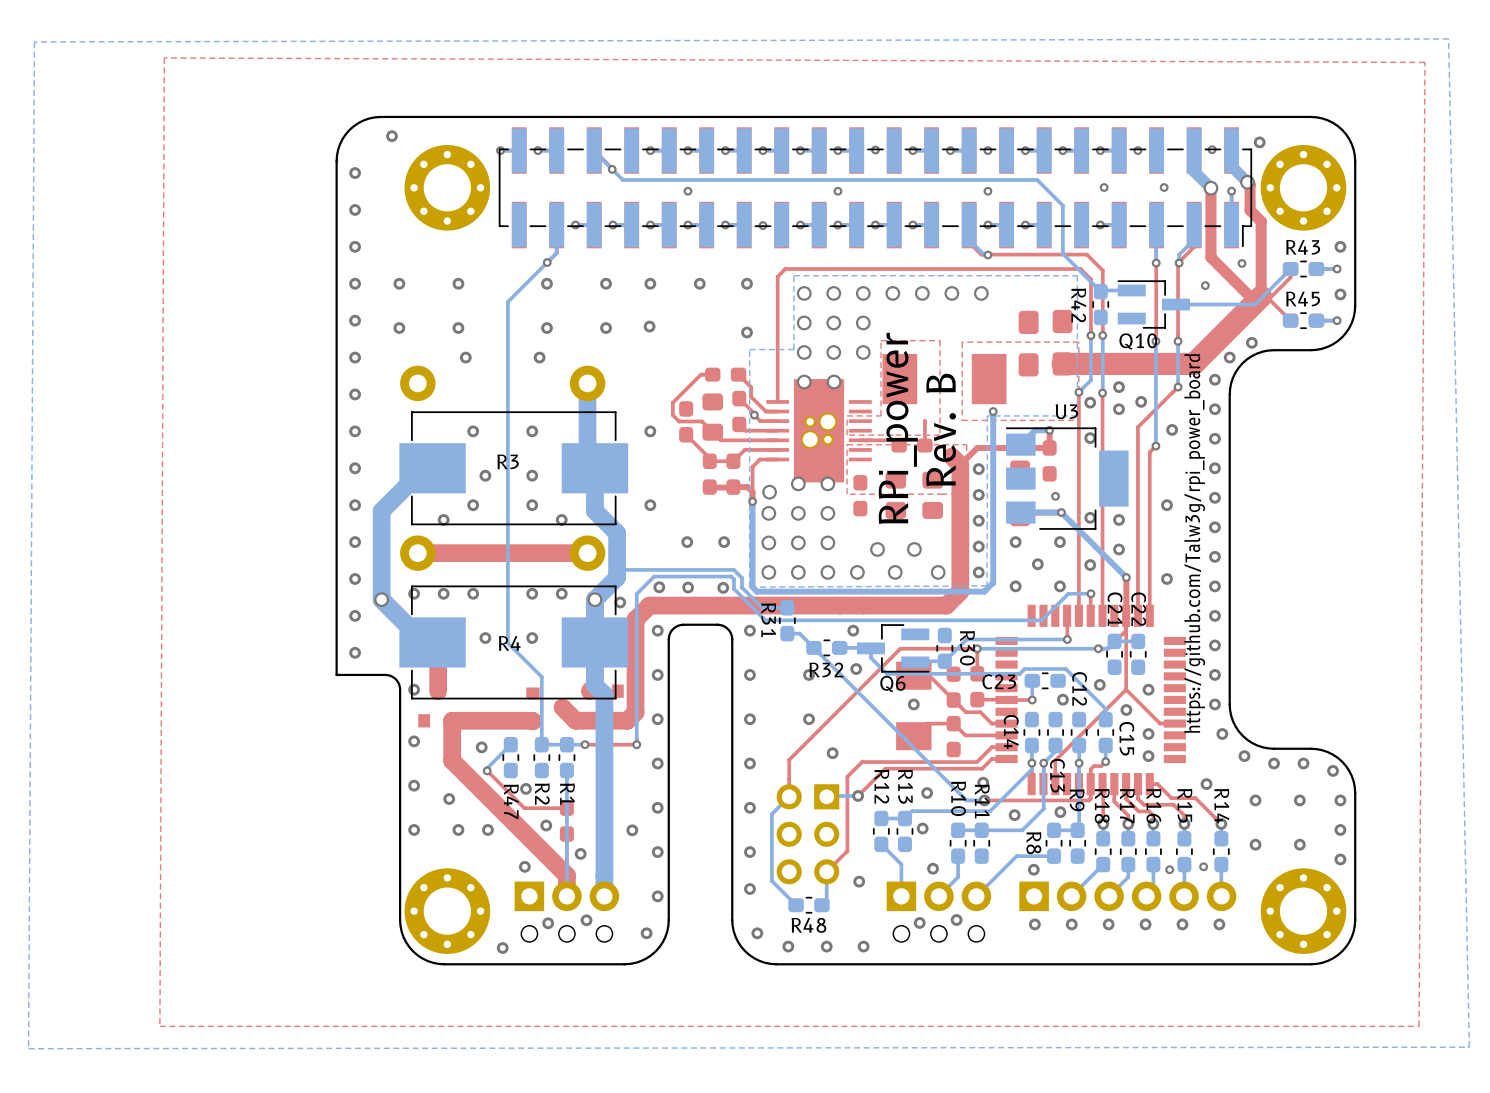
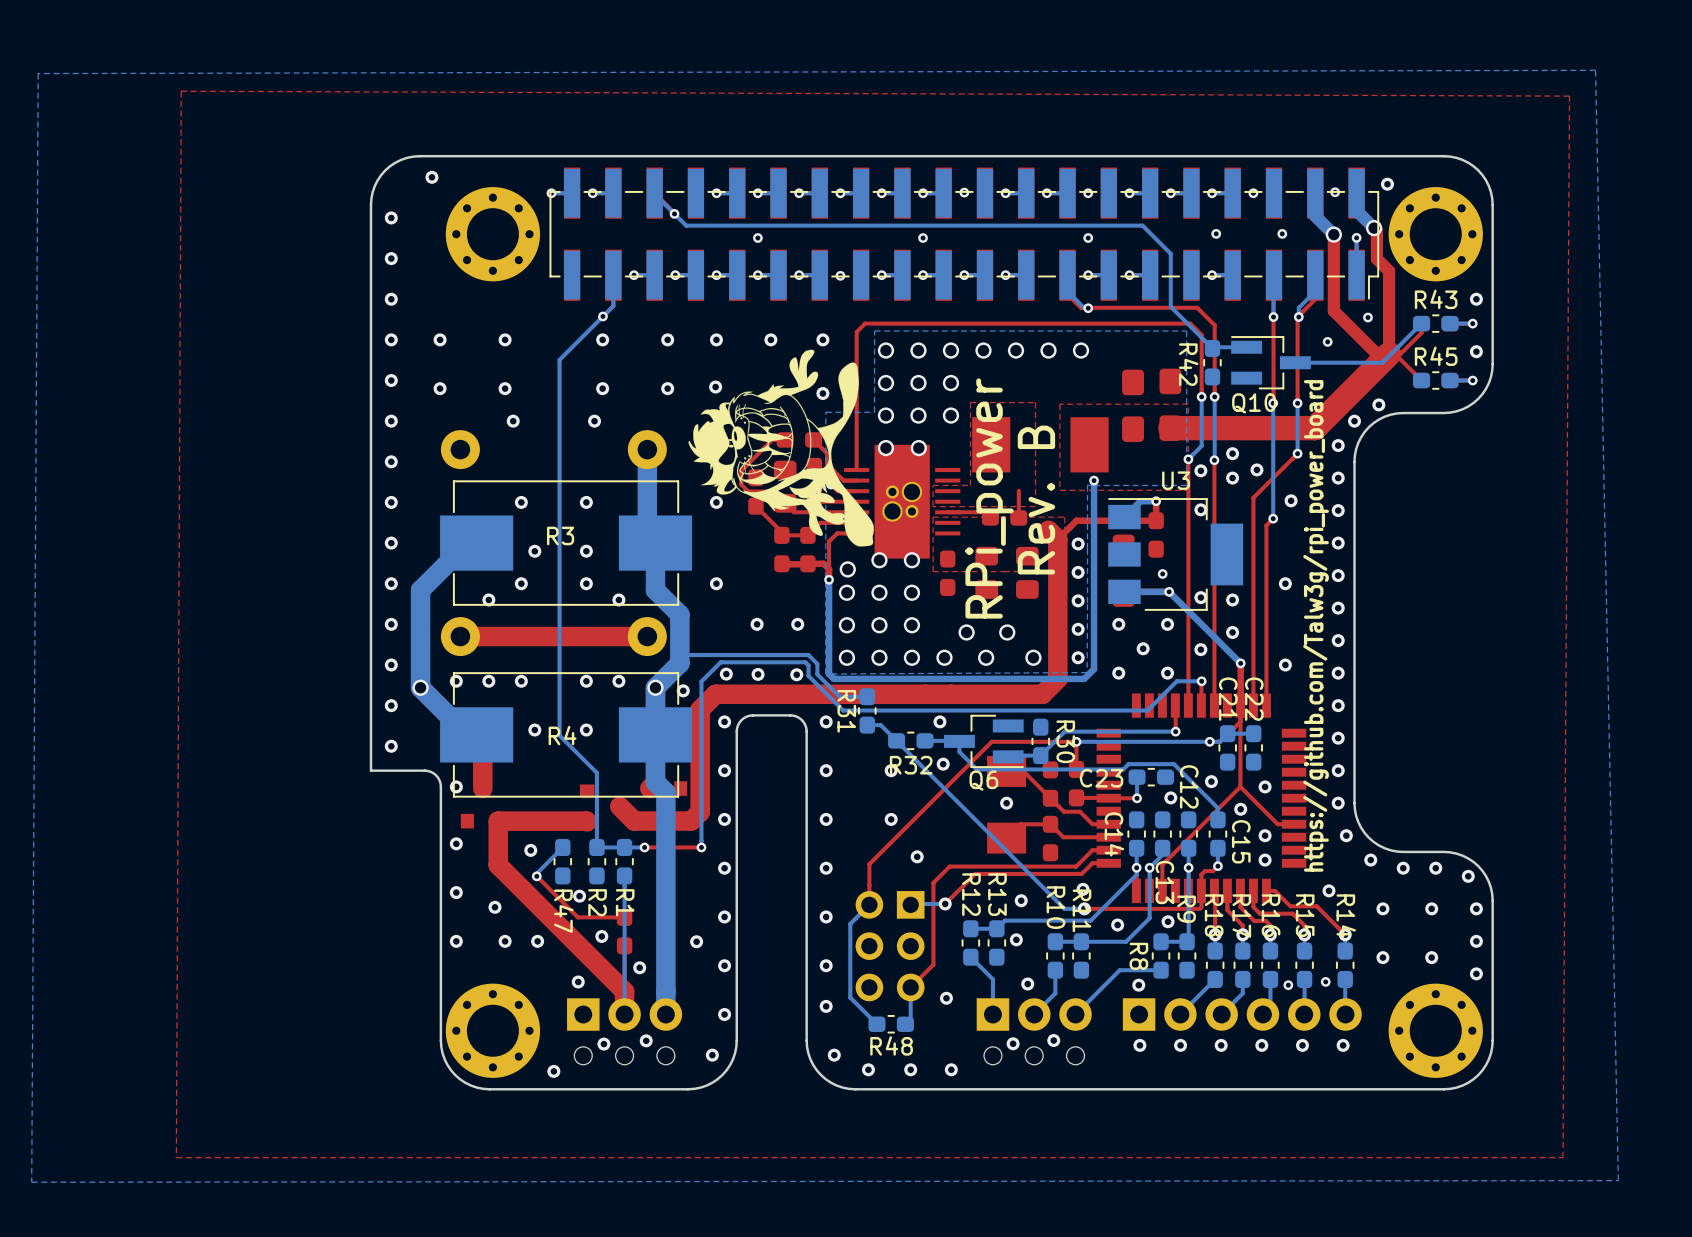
drawing: none -> [688, 349, 874, 547]

